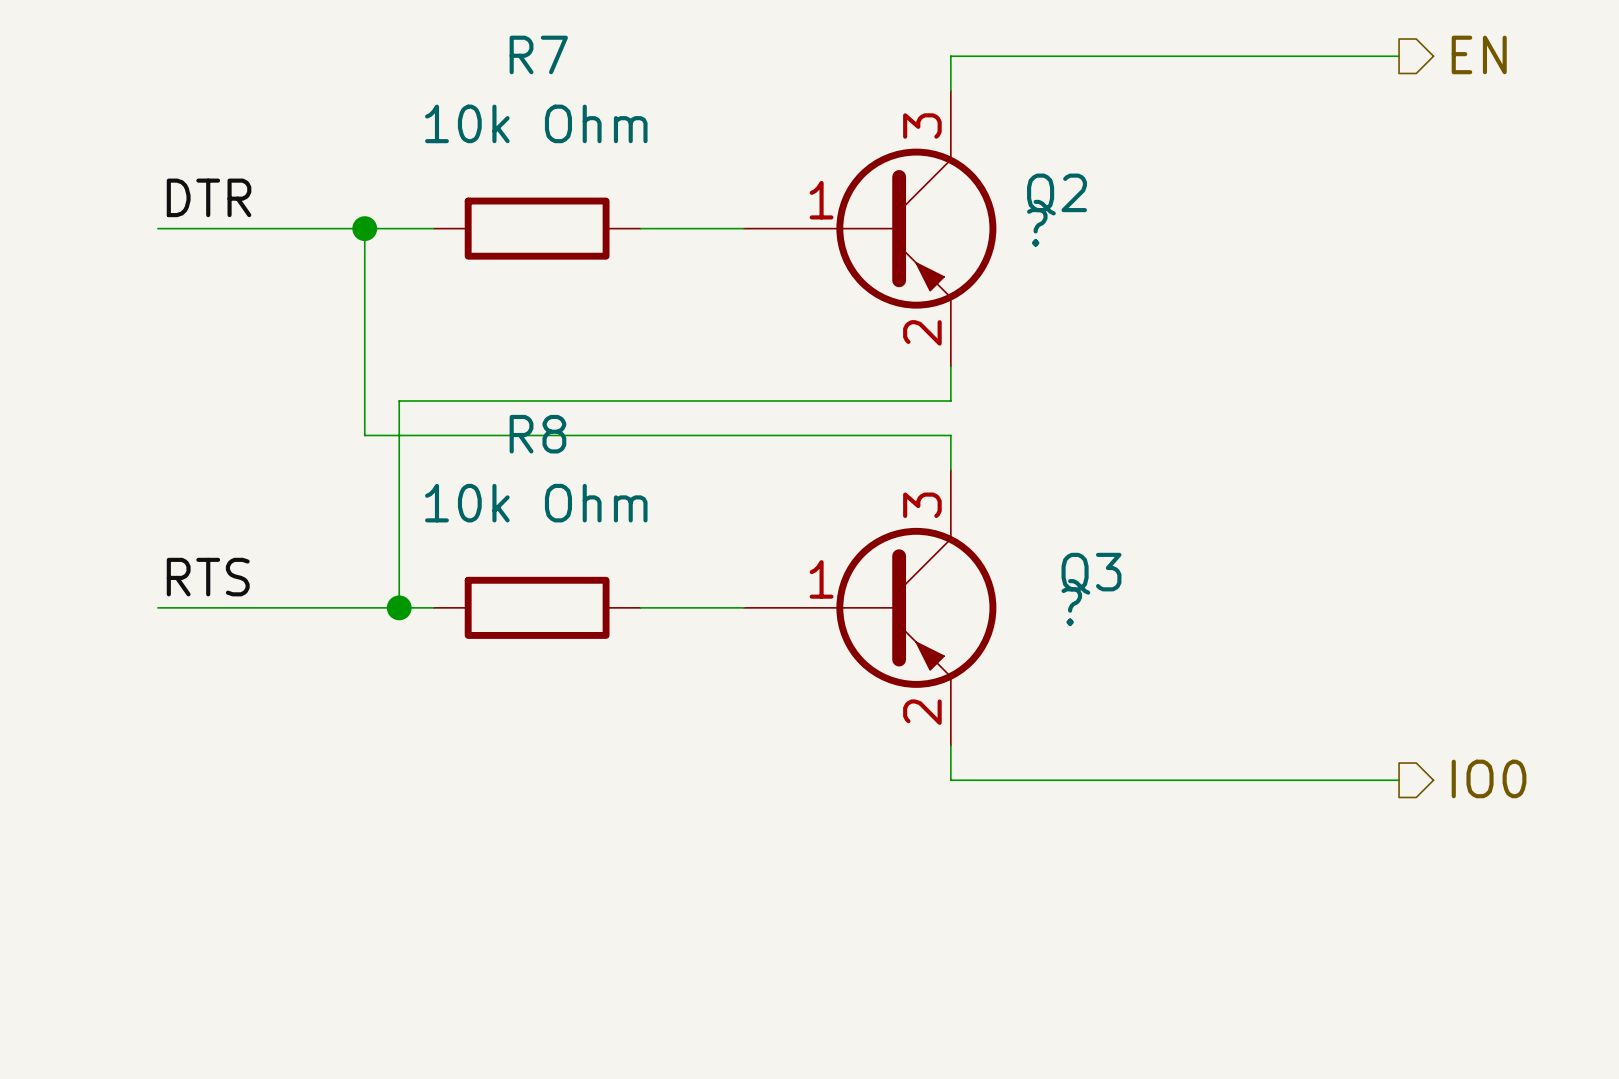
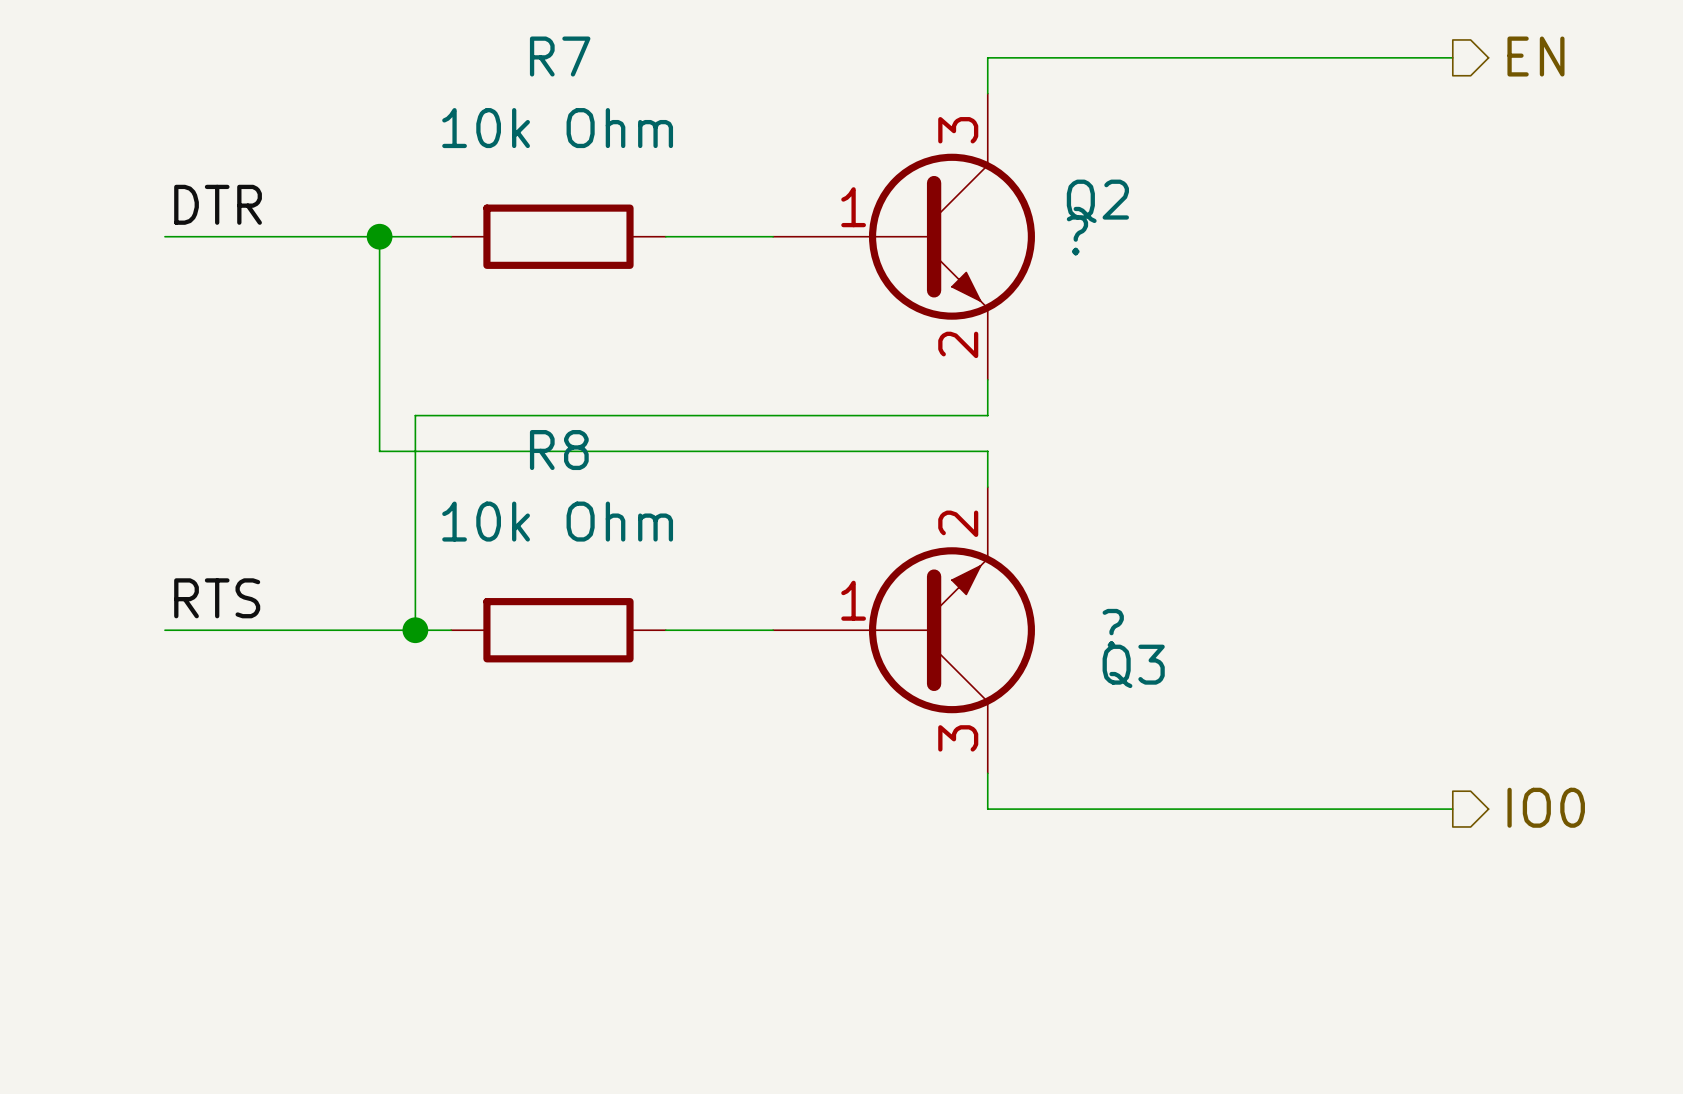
Q2 symbol: [743, 90, 997, 367] -> [773, 93, 1035, 380]
Q3 symbol: [743, 469, 997, 746] -> [773, 487, 1035, 774]
Q3 name position: Q3 (1091, 573) -> Q3 (1133, 666)

